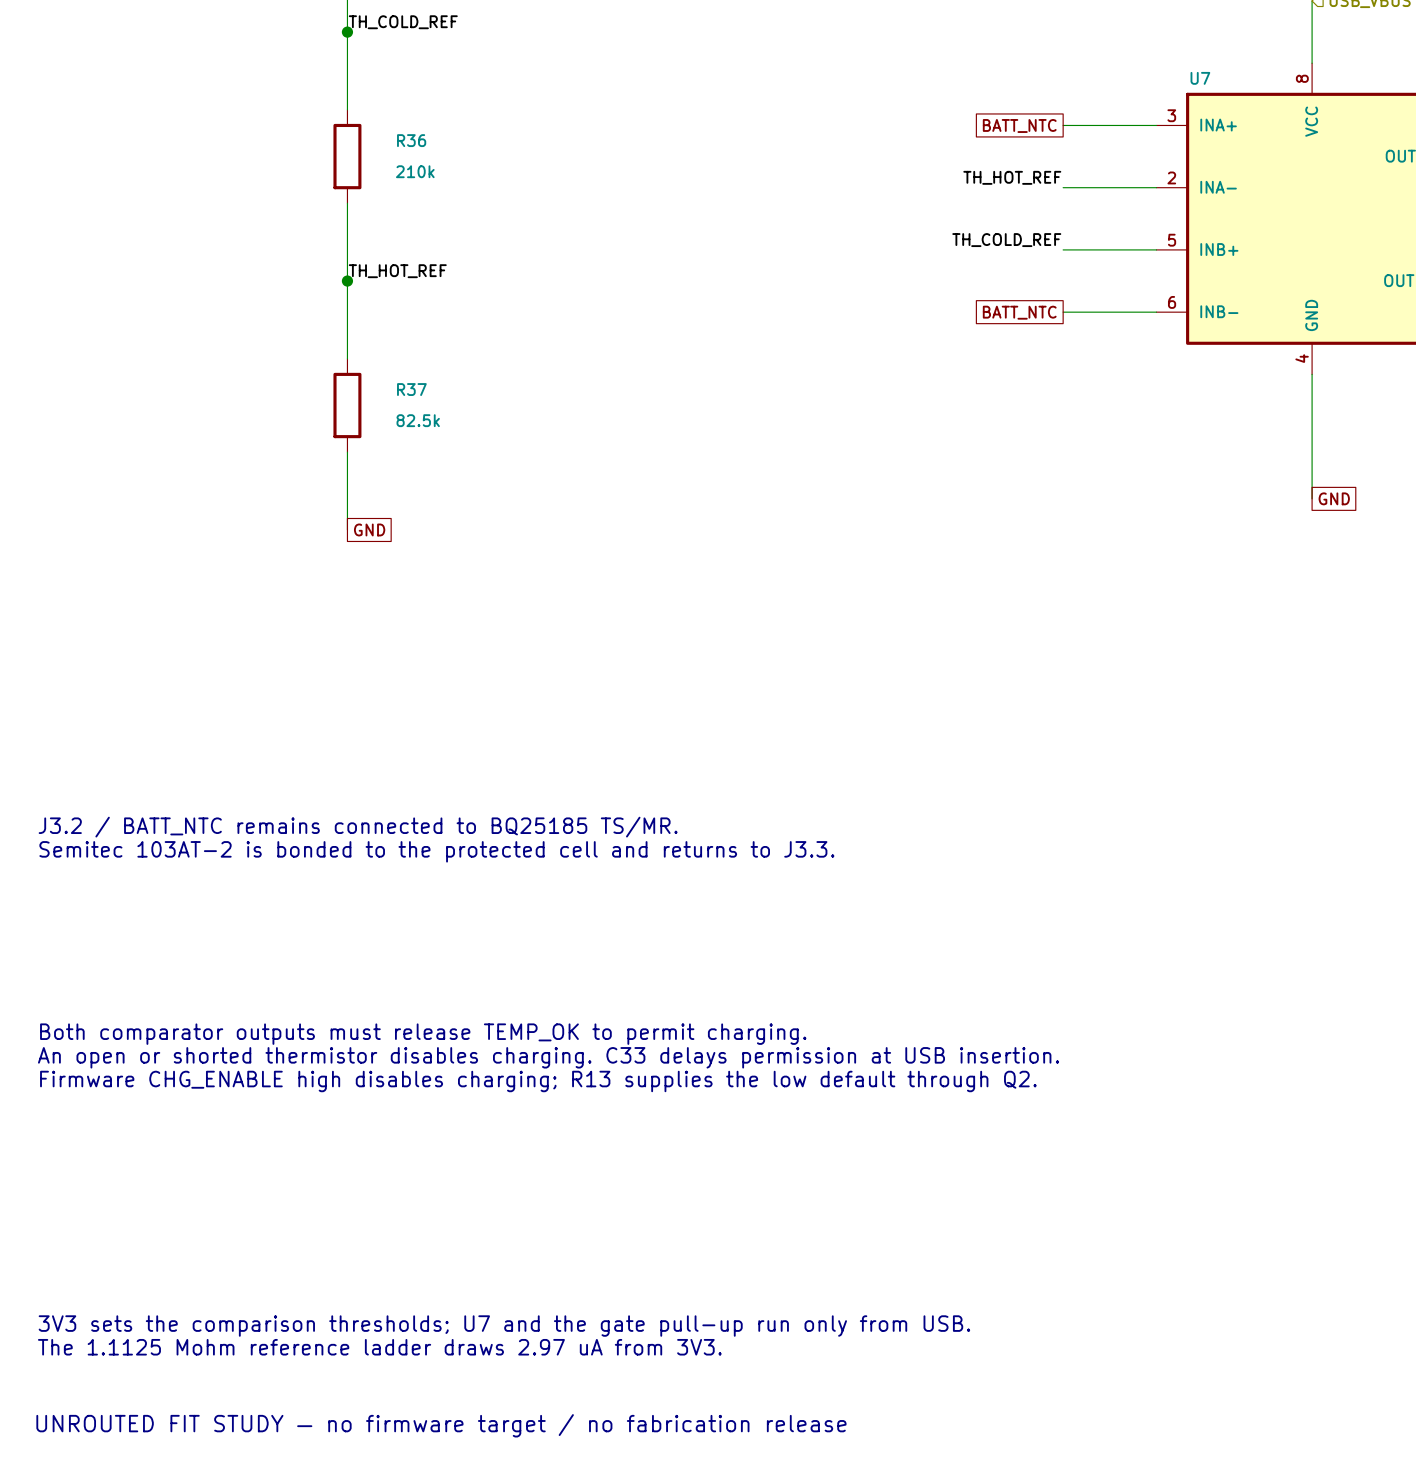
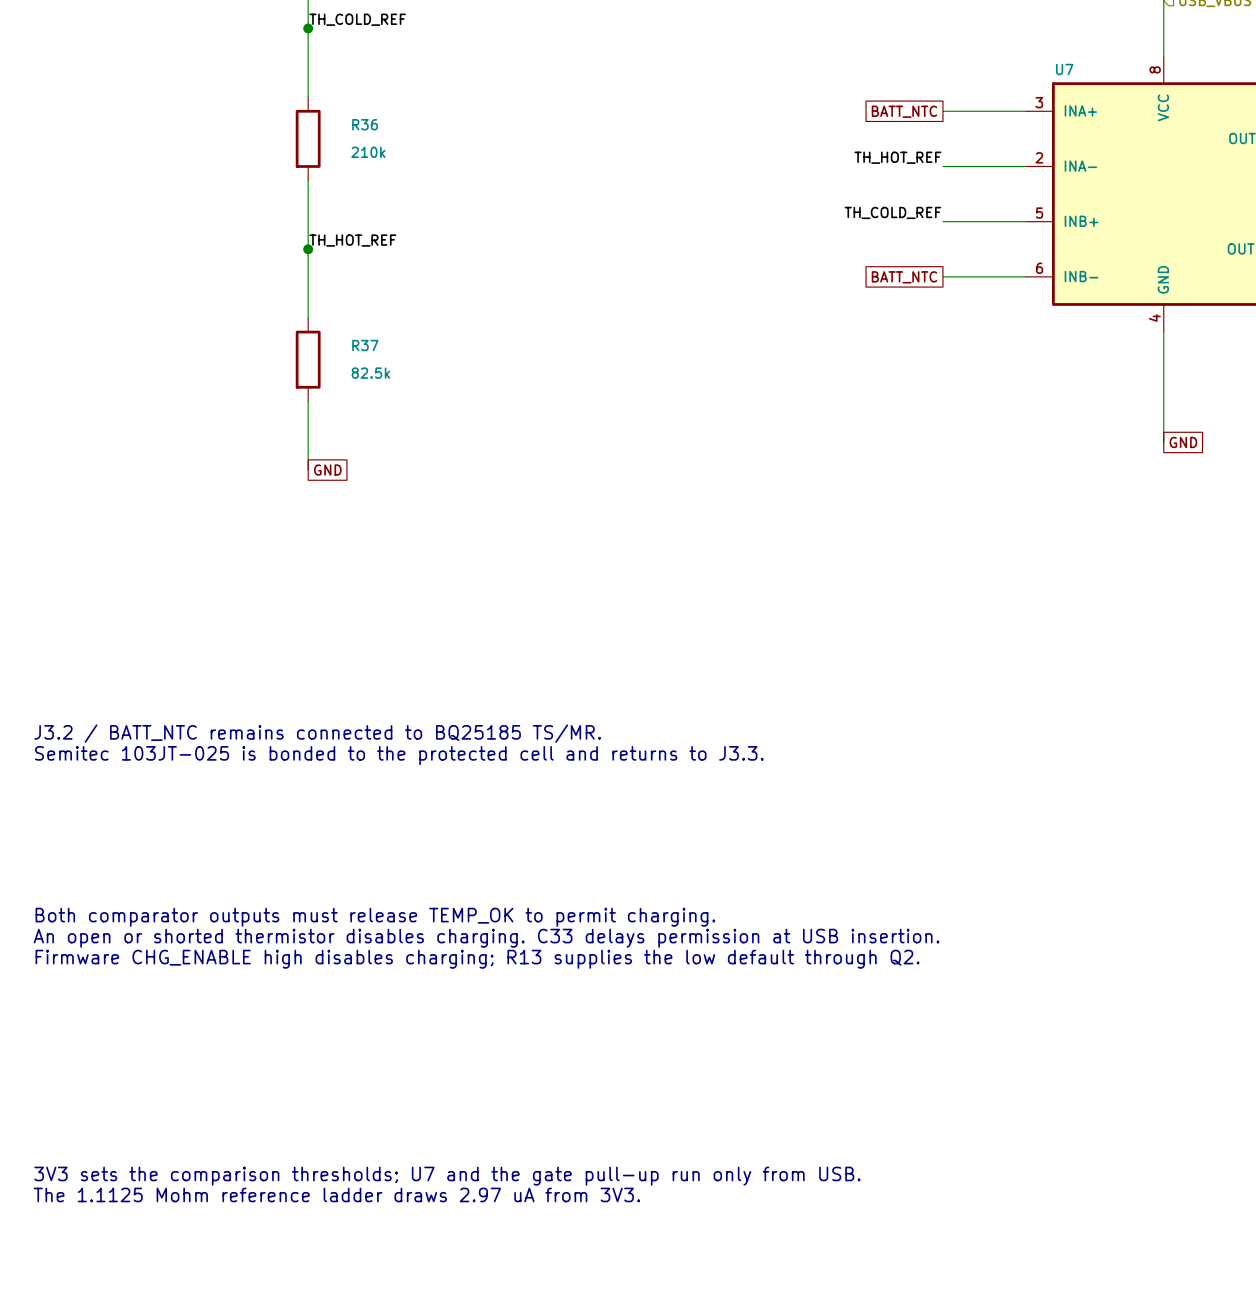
text: Semitec 103AT-2 is bonded to the protected cell and returns to J3.3. (436, 851) -> Semitec 103JT-025 is bonded to the protected cell and returns to J3.3. (399, 755)
text: UNROUTED FIT STUDY — no firmware target / no fabrication release (441, 1425) -> none

